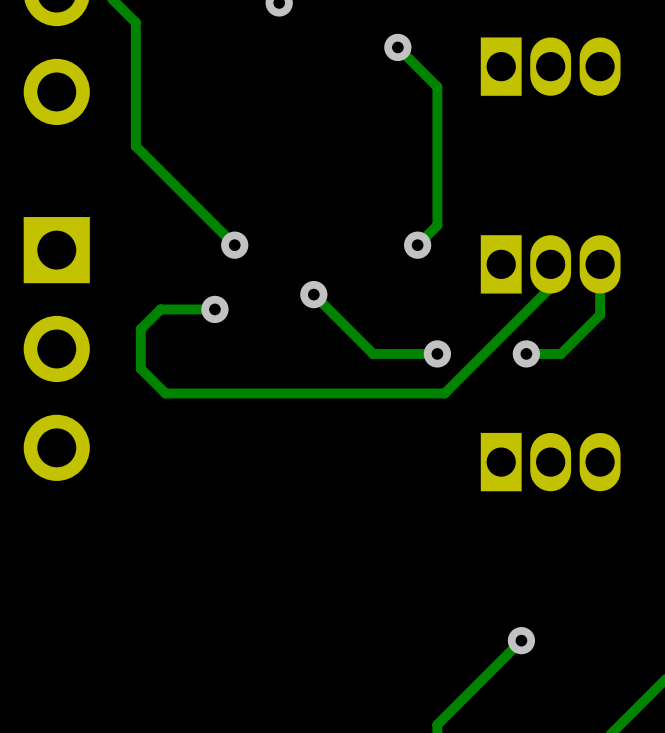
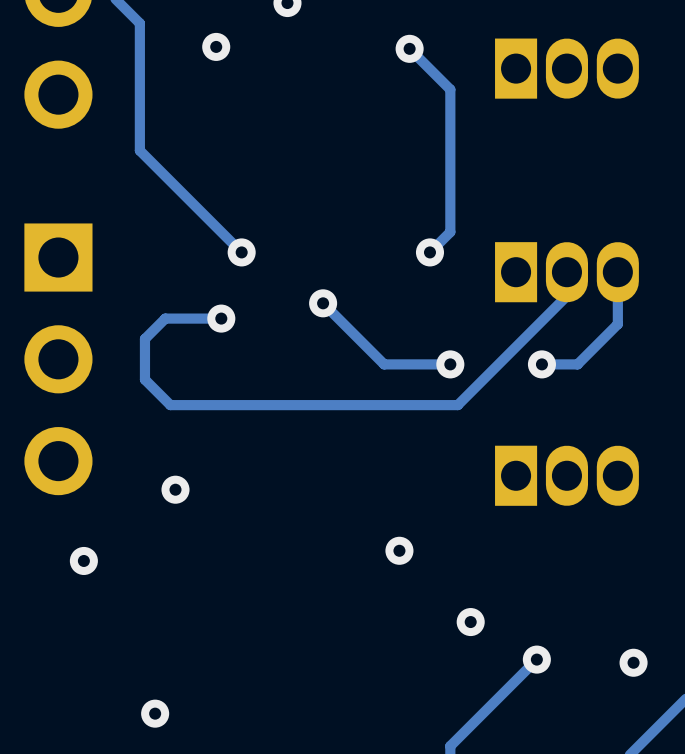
via: none -> (216, 46)
via: none -> (175, 489)
via: none -> (399, 550)
via: none -> (83, 560)
via: none -> (470, 622)
via: none -> (633, 662)
via: none -> (155, 713)

